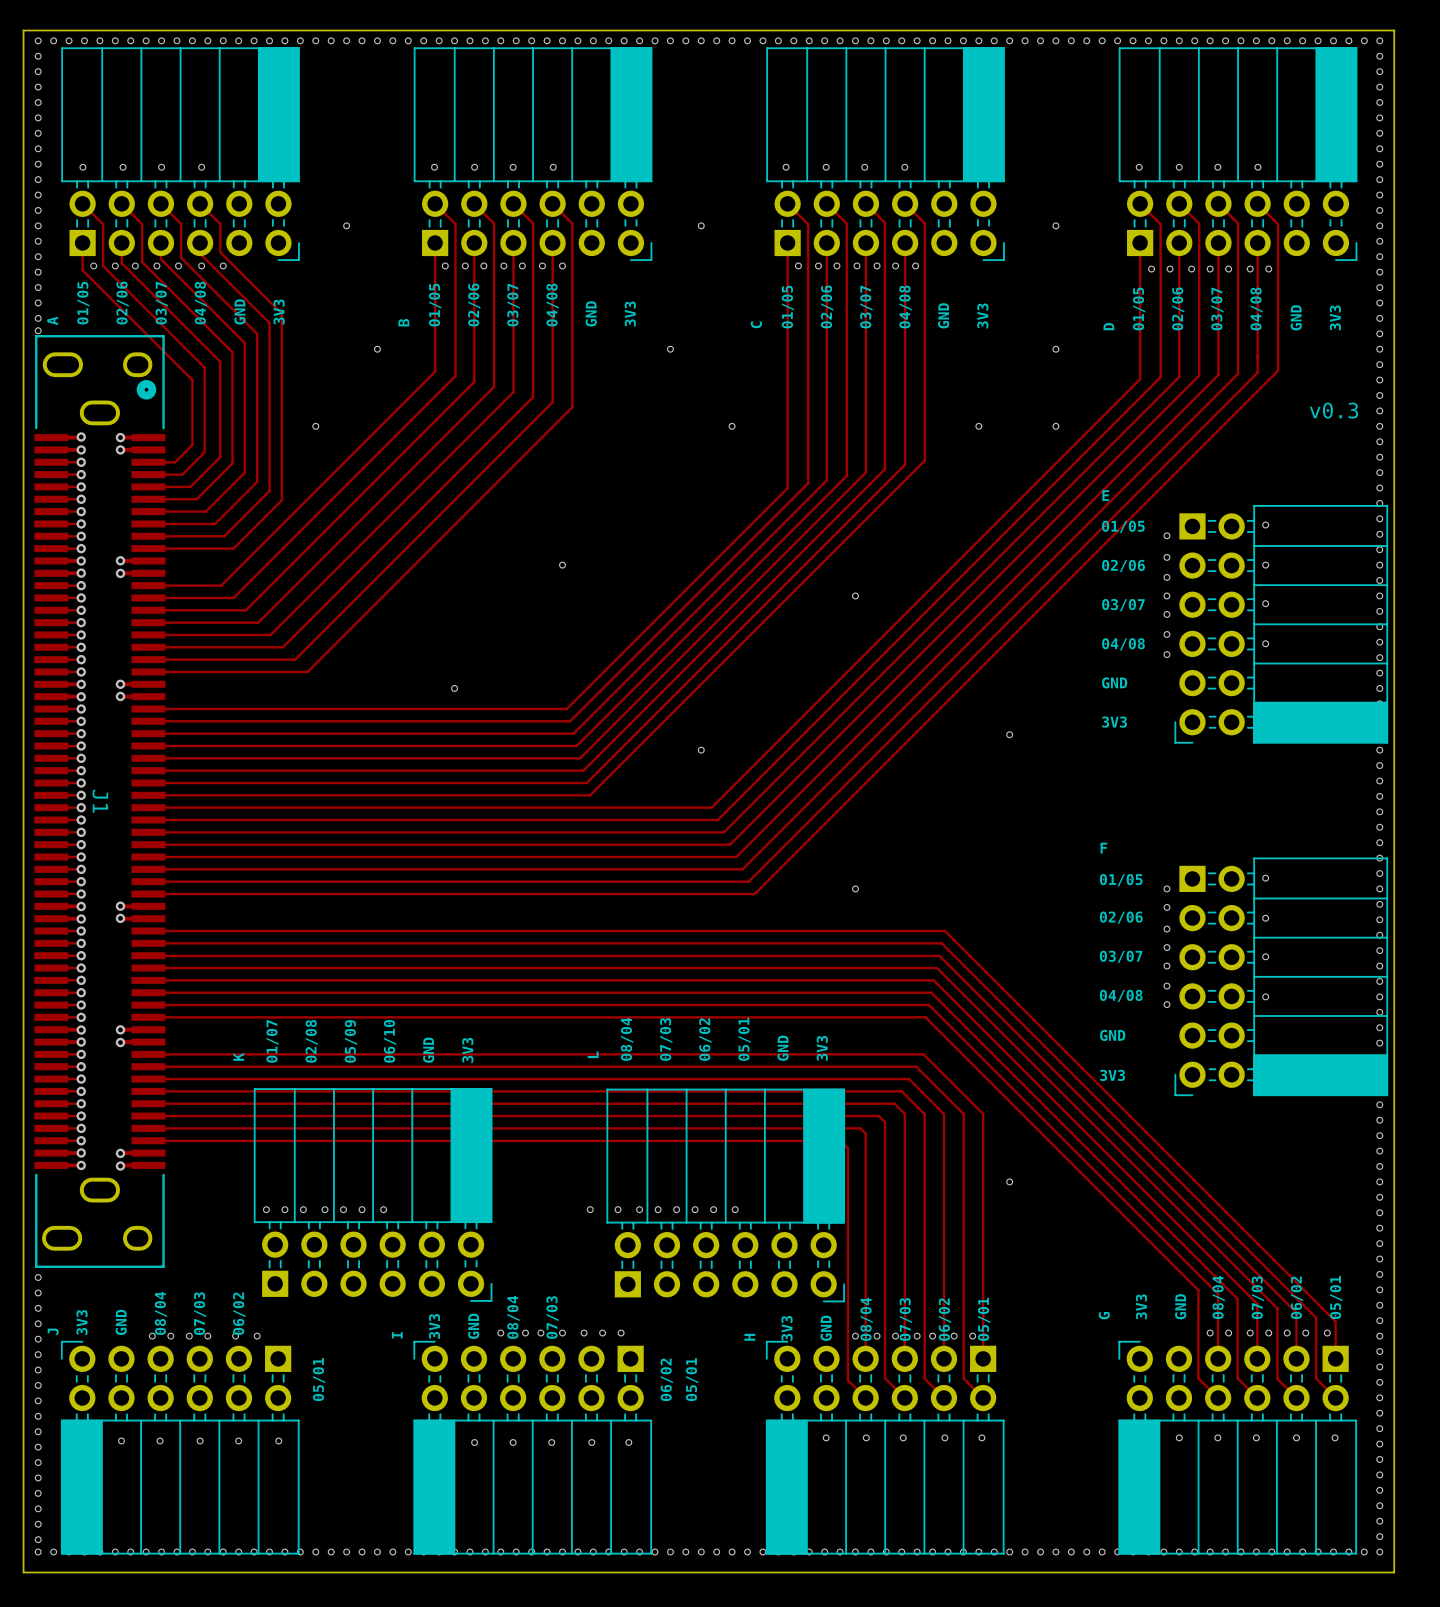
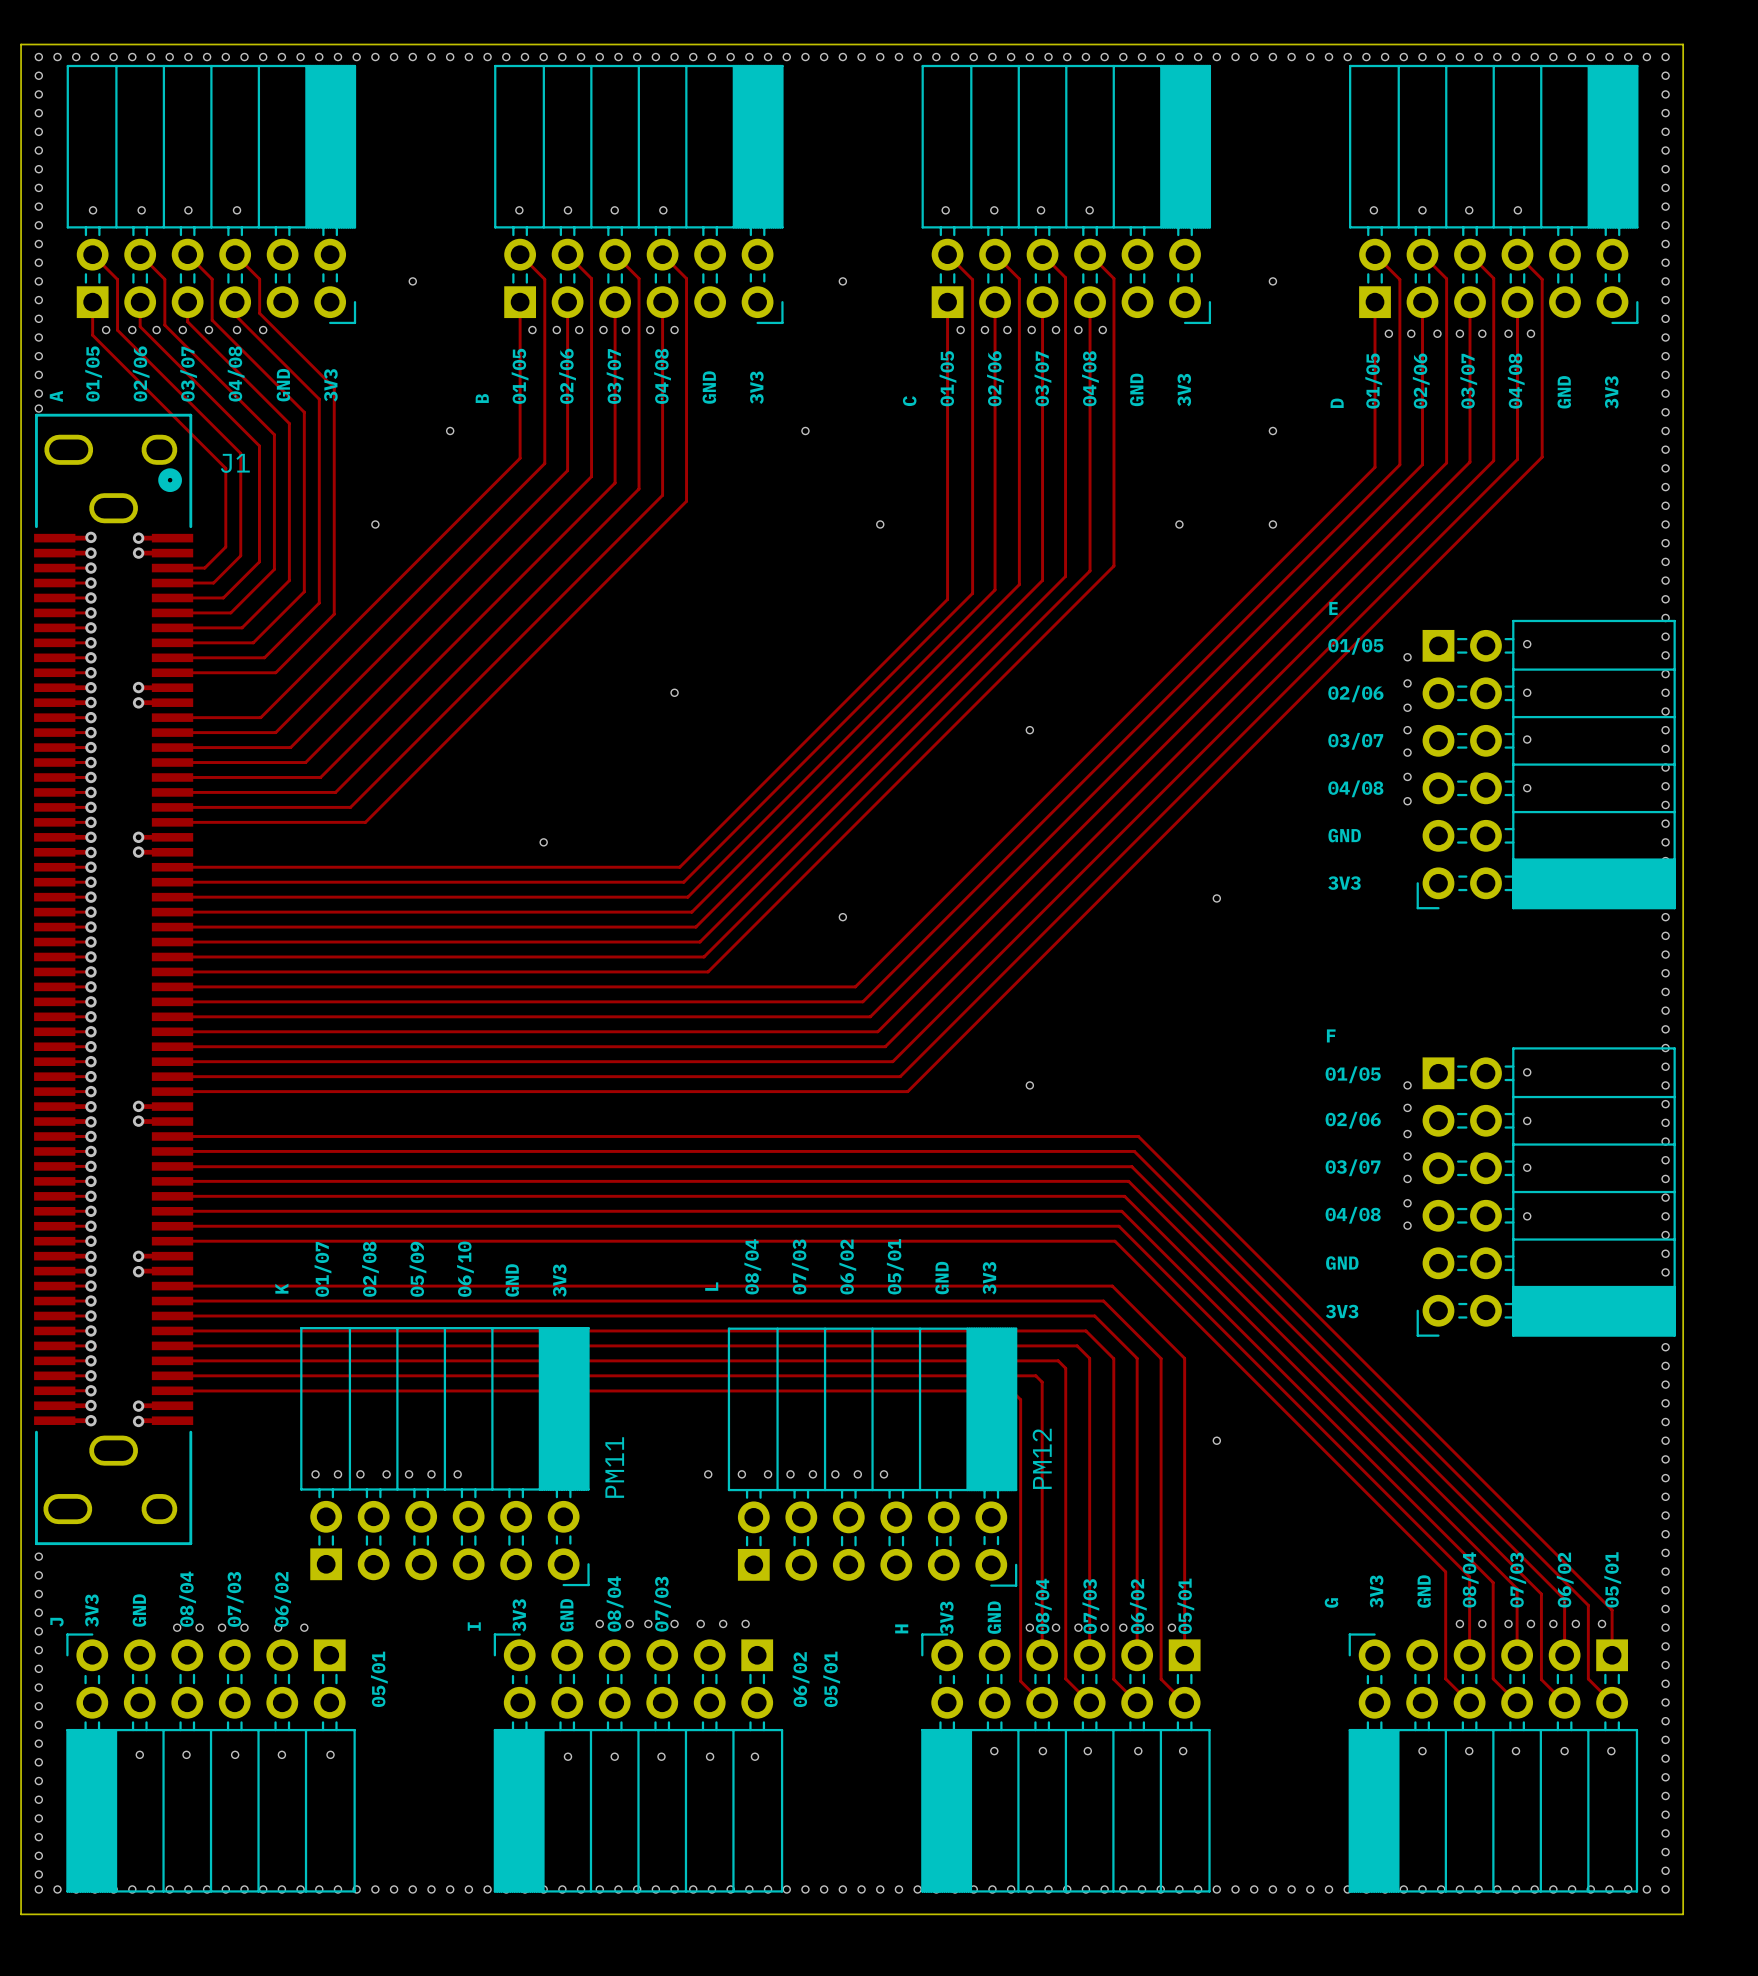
text: v0.3 (1334, 410) -> none
J1 name rotation: 0° (100, 801) -> 90° counterclockwise (235, 463)
J1 name position: J1 (100, 801) -> J1 (235, 463)
PM12 name: none -> PM12 (1042, 1458)
PM11 name: none -> PM11 (614, 1467)

